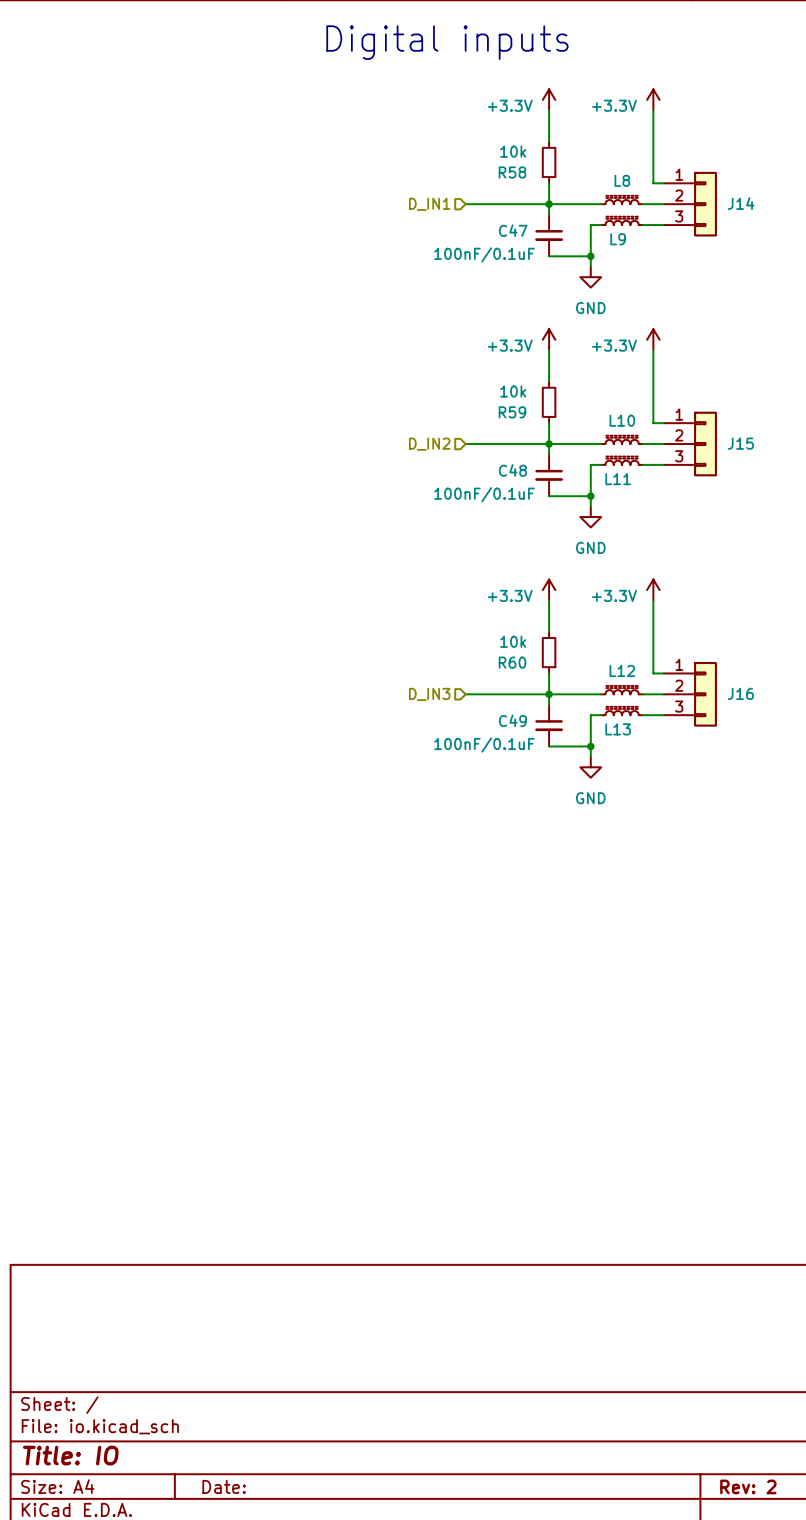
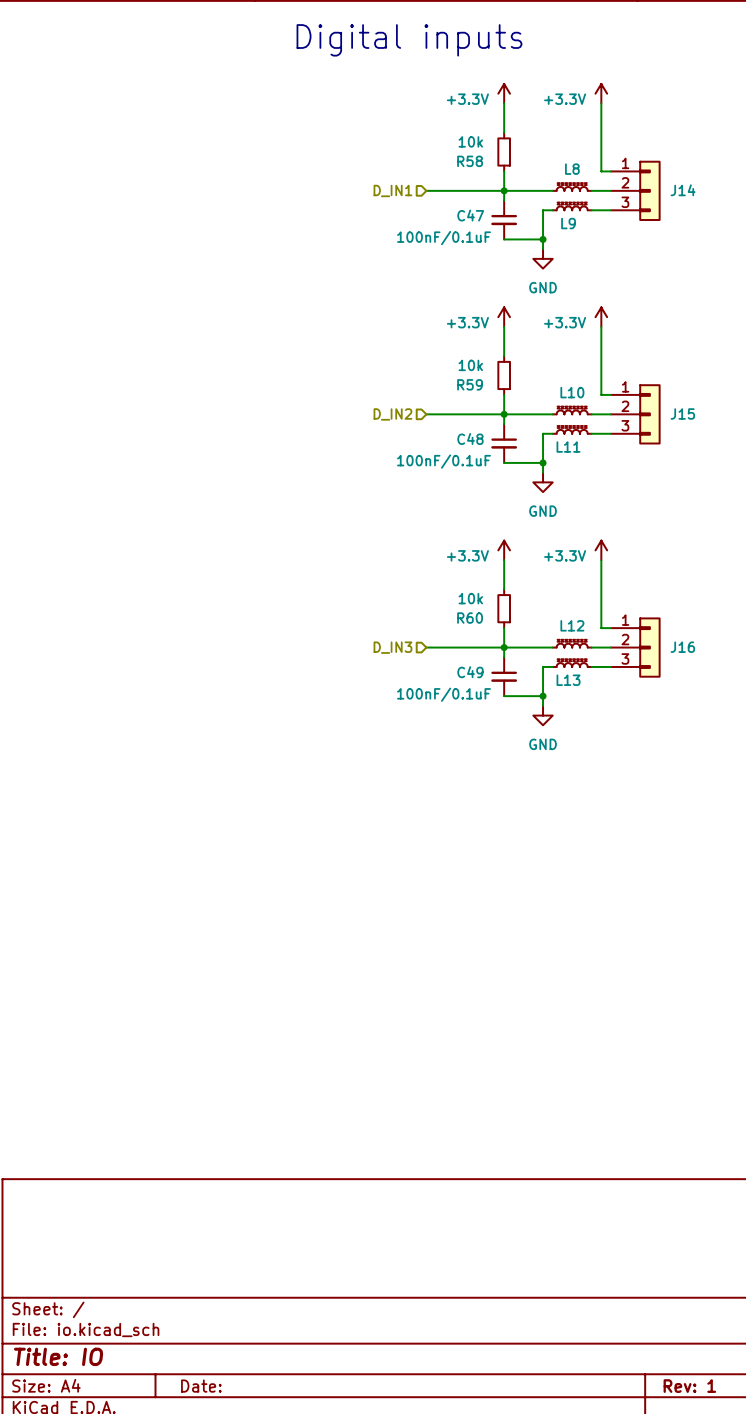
title block: Rev: 2 (748, 1486) -> Rev: 1 (689, 1386)

